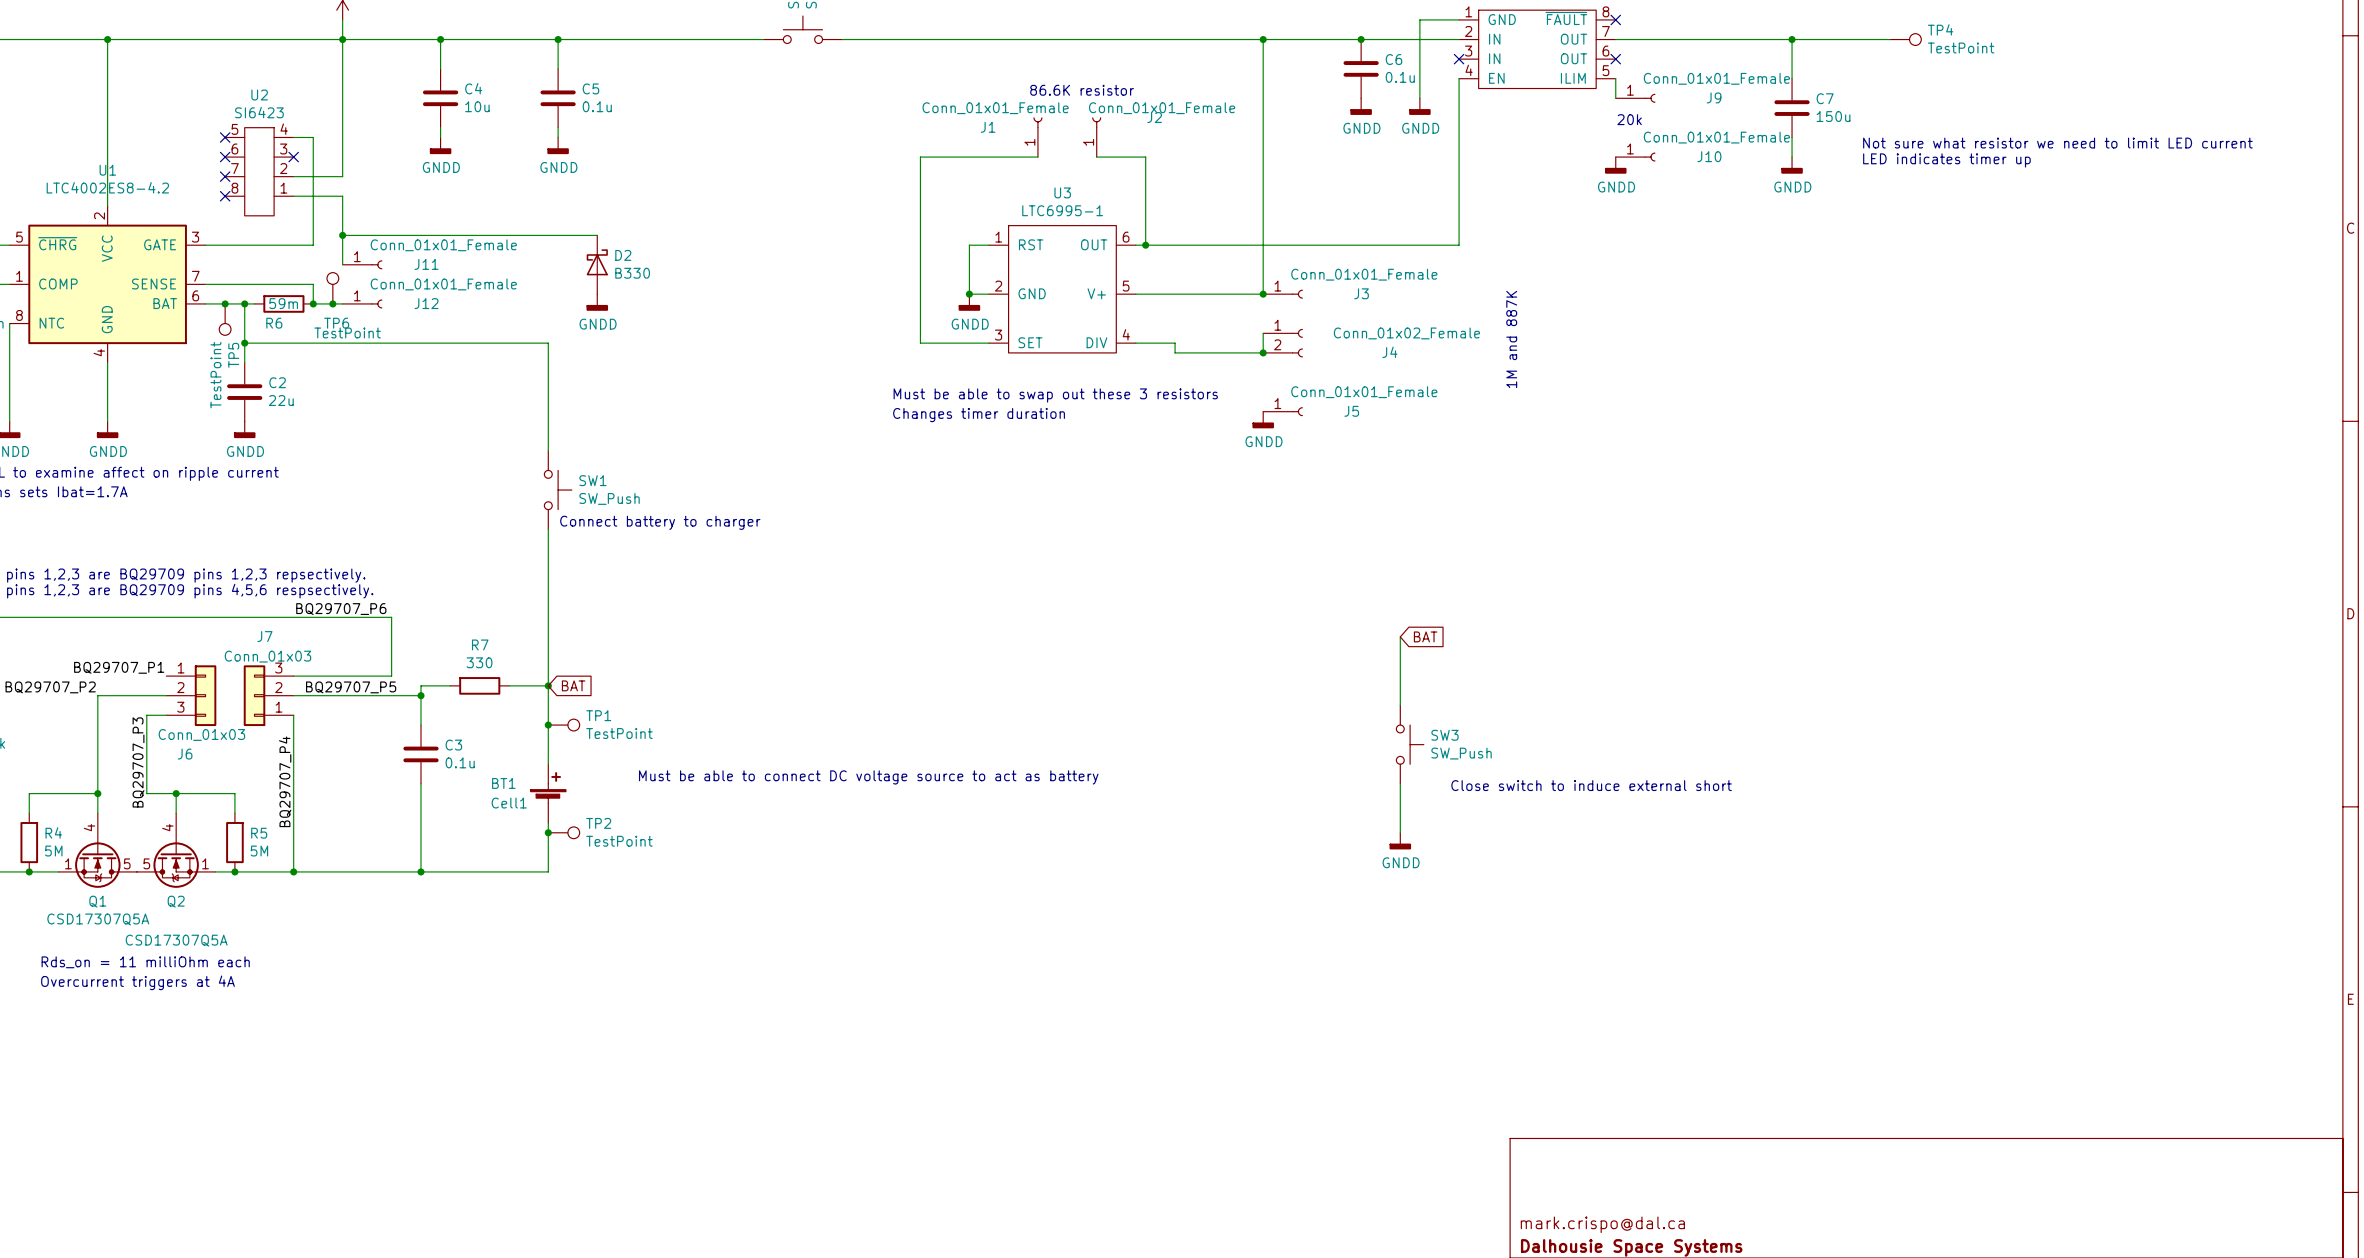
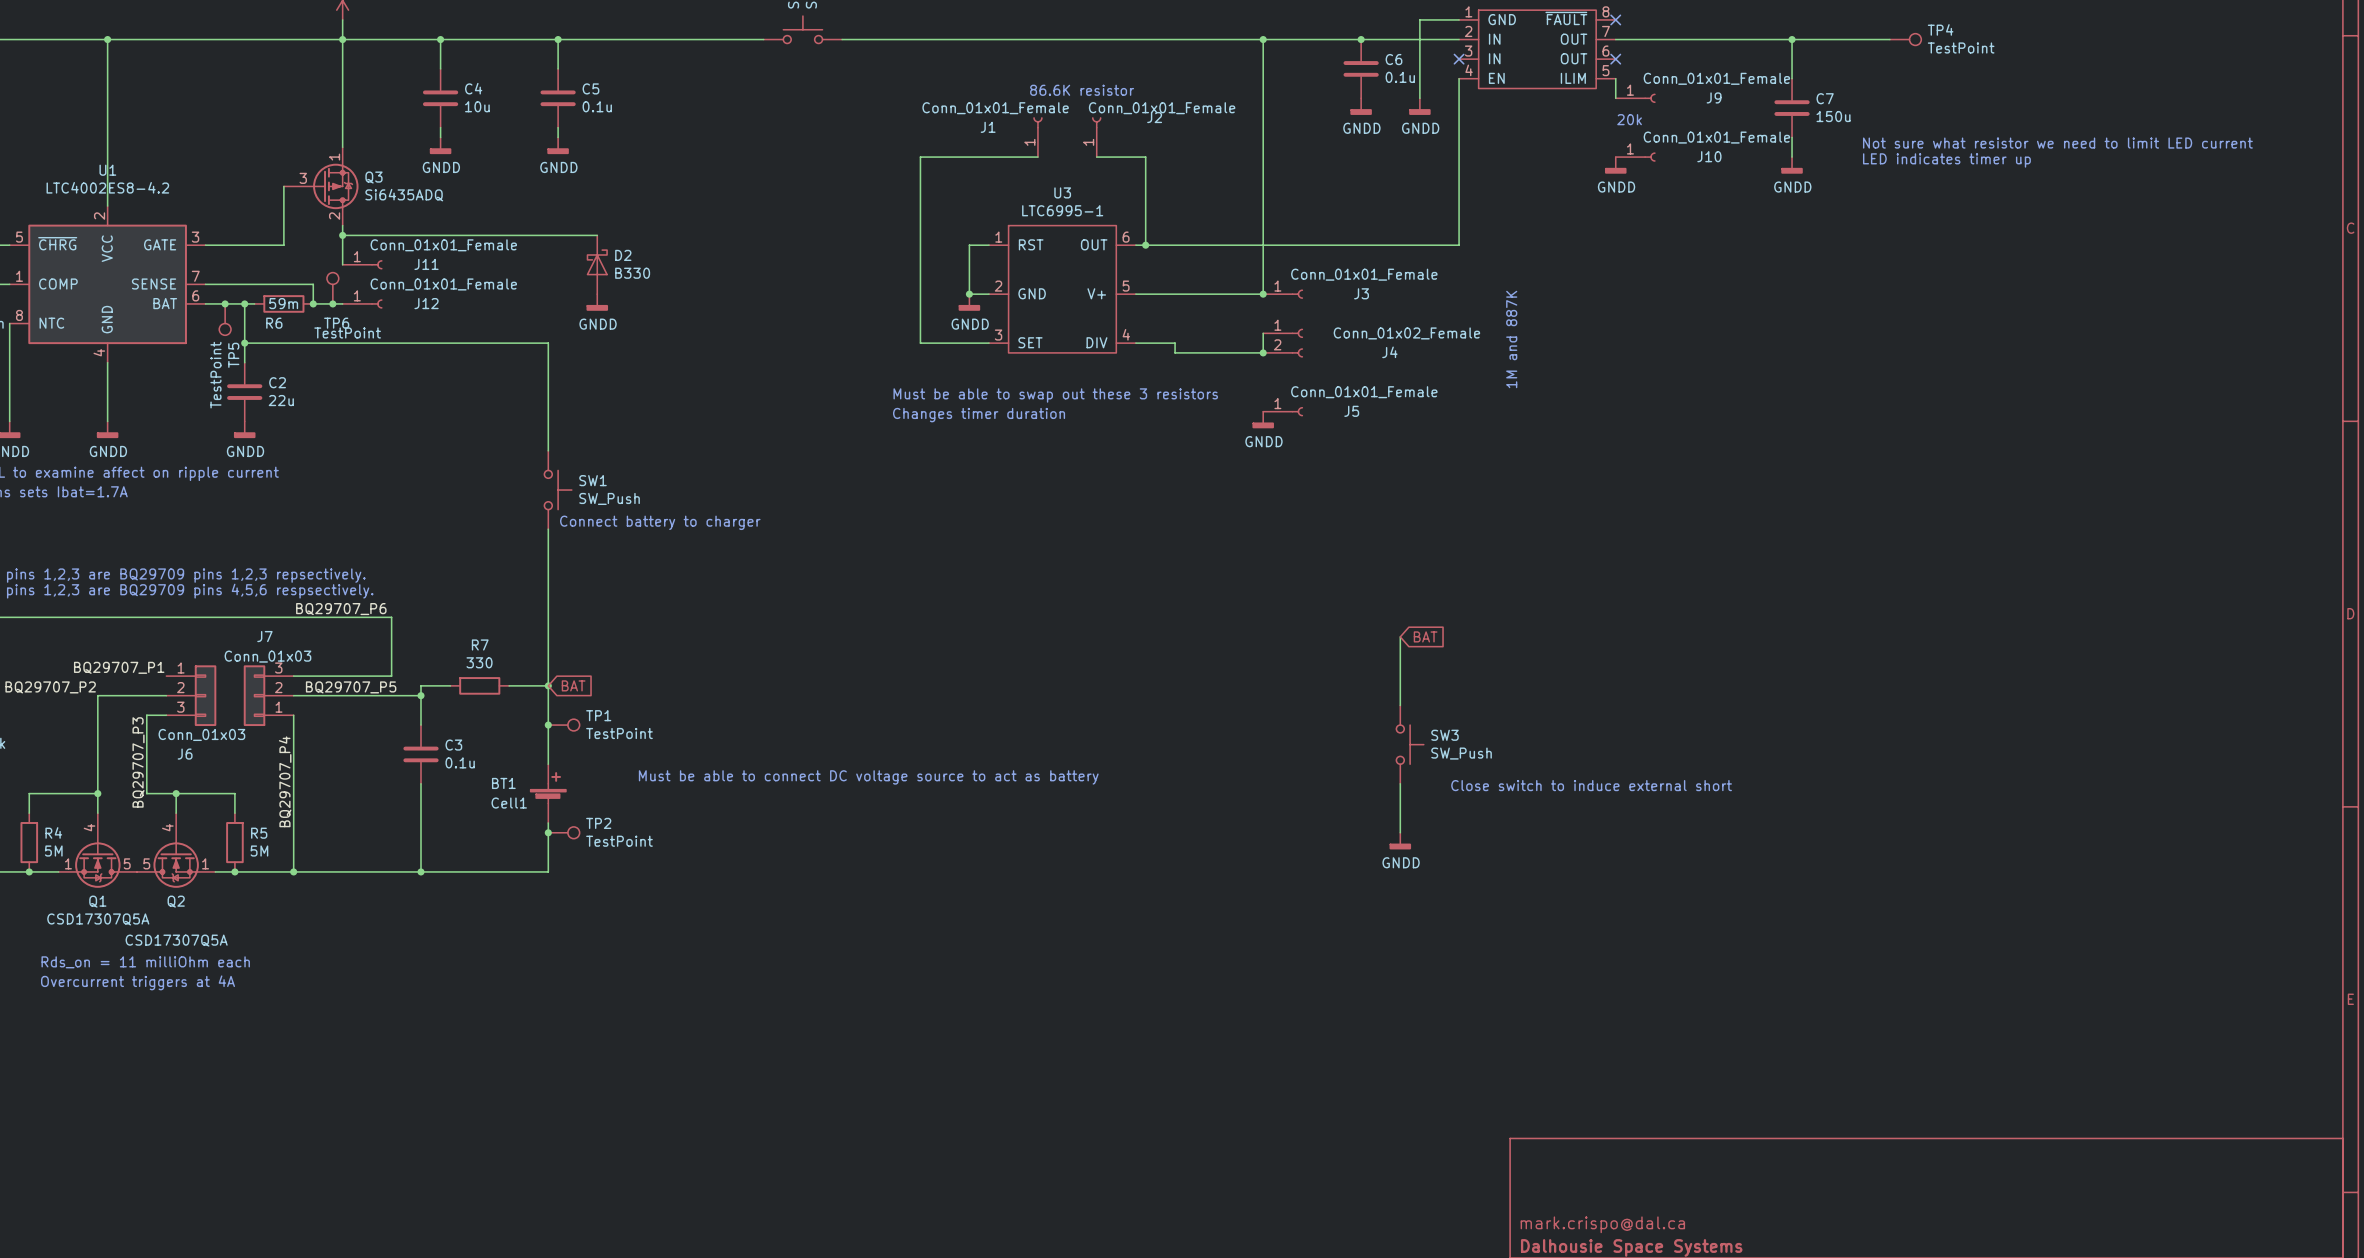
no-connect mark: (225, 137) -> none
wire: (293, 137) (313, 137) (313, 245) (283, 245) -> (283, 186) (283, 245)
wire: (342, 147) (342, 176) (293, 176) -> none
no-connect mark: (225, 157) -> none
no-connect mark: (293, 157) -> none
U2: SI6423 (259, 171) -> none
no-connect mark: (225, 176) -> none
Q3: none -> Si6435ADQ (321, 186)
no-connect mark: (225, 196) -> none
wire: (293, 196) (342, 196) (342, 225) -> none

